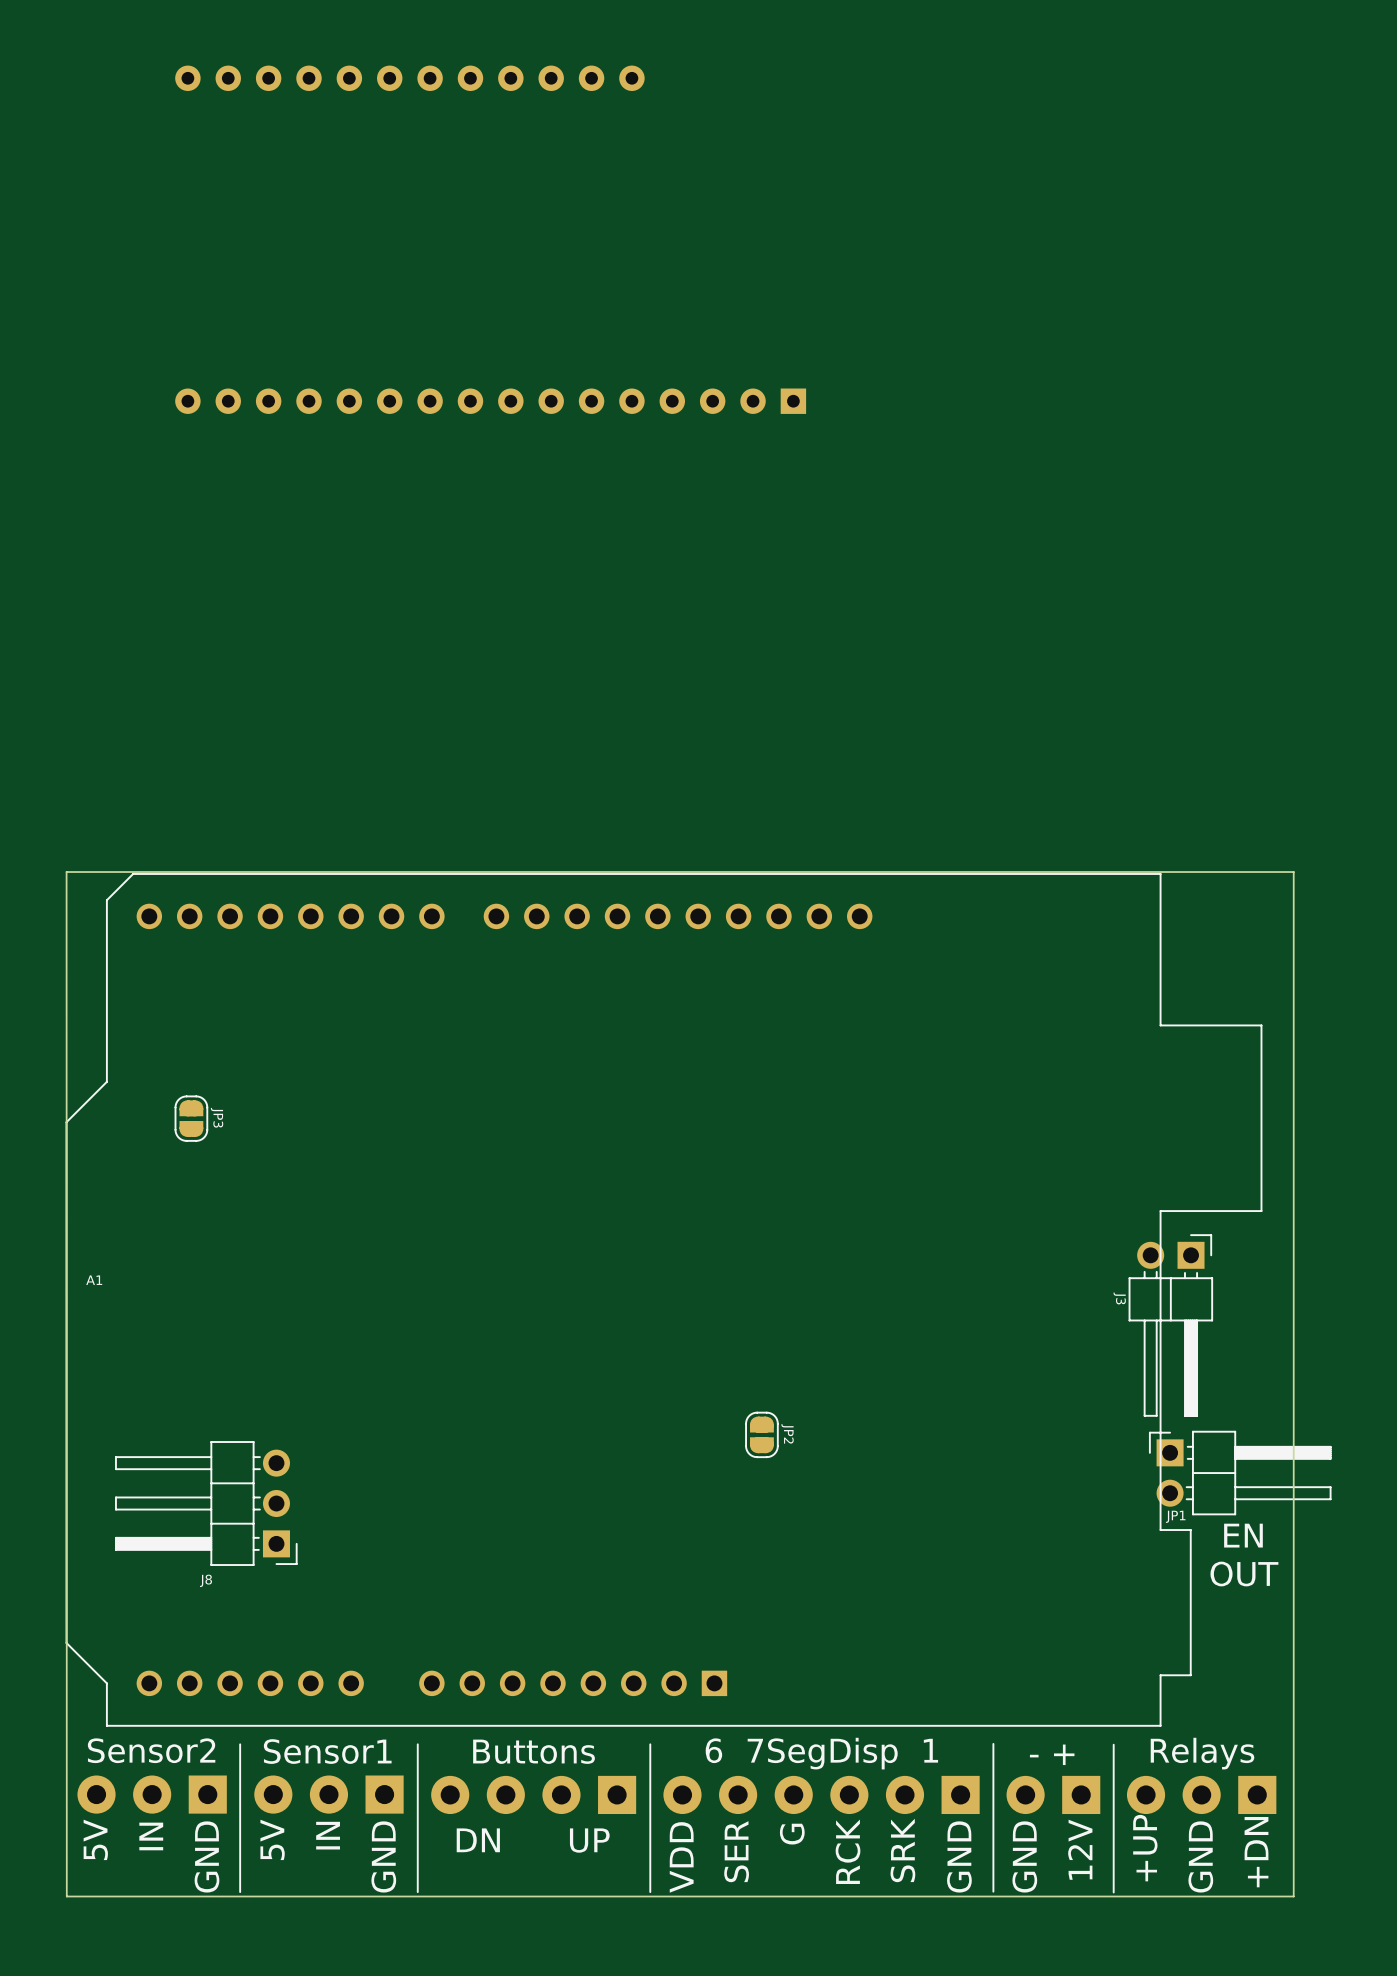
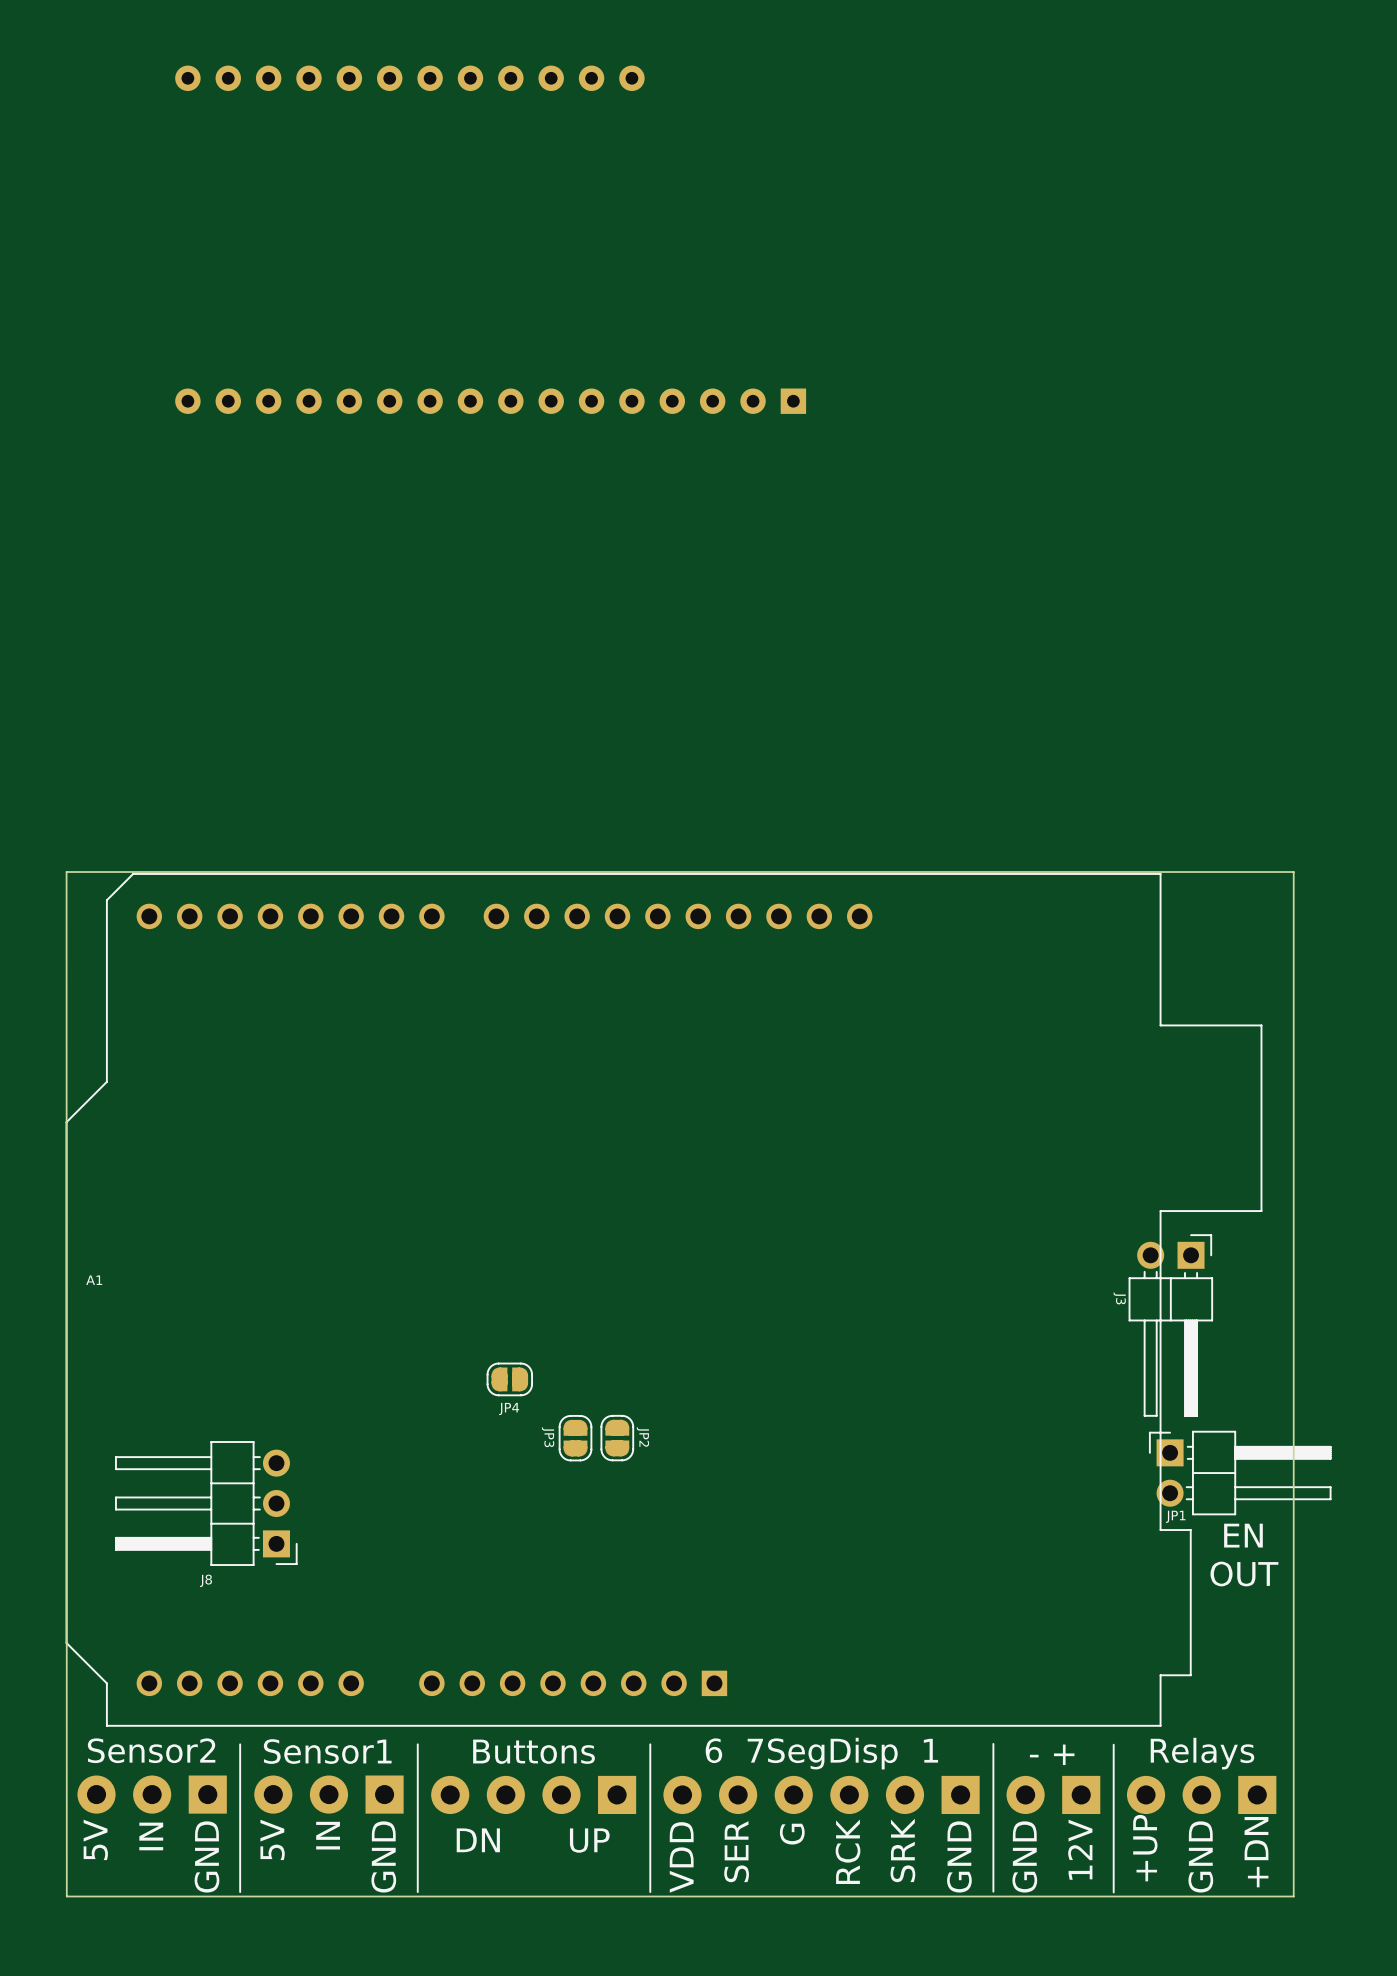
JP3 name position: JP3 (217, 1117) -> JP3 (548, 1437)
JP3 position: (191, 1118) -> (575, 1438)
JP4: none -> (509, 1379)
JP2 position: (761, 1434) -> (617, 1438)

